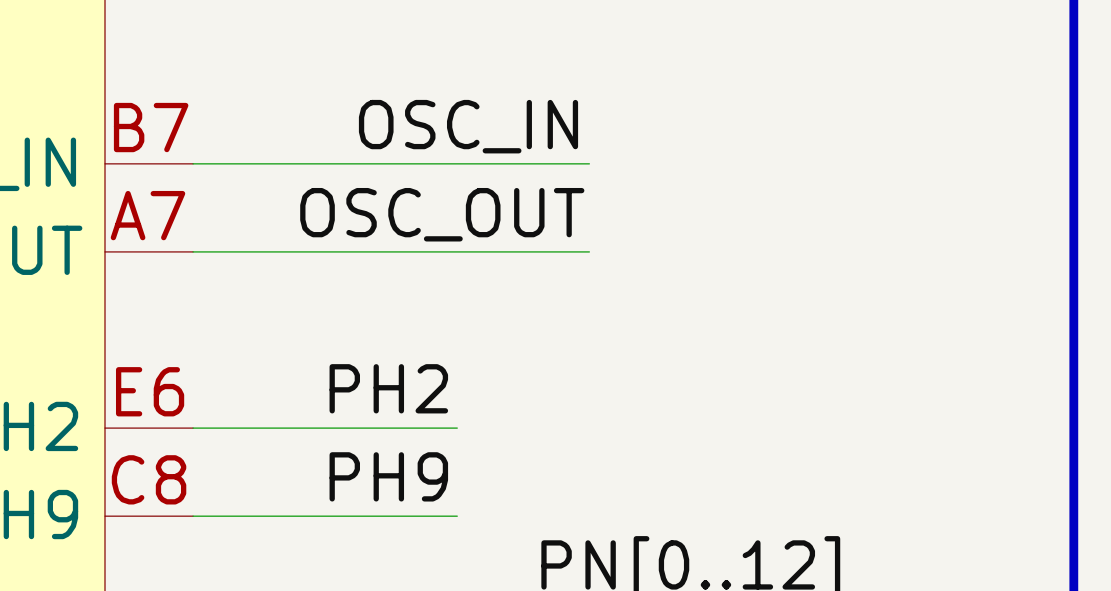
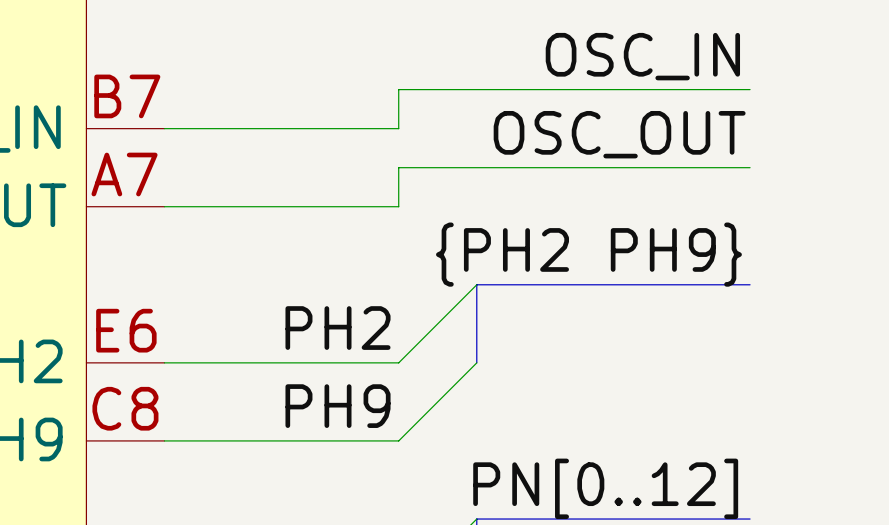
label position: OSC_IN (468, 126) -> OSC_IN (642, 56)
wire: (457, 163) (589, 163) -> (398, 128) (398, 89) (750, 89)
label position: OSC_OUT (442, 214) -> OSC_OUT (619, 134)
wire: (457, 251) (589, 251) -> (398, 206) (398, 167) (750, 167)
label: none -> {PH2 PH9} (588, 254)
wire: none -> (476, 284) (398, 362)
bus: none -> (750, 284) (476, 284) (476, 362)
wire: none -> (476, 362) (398, 440)

